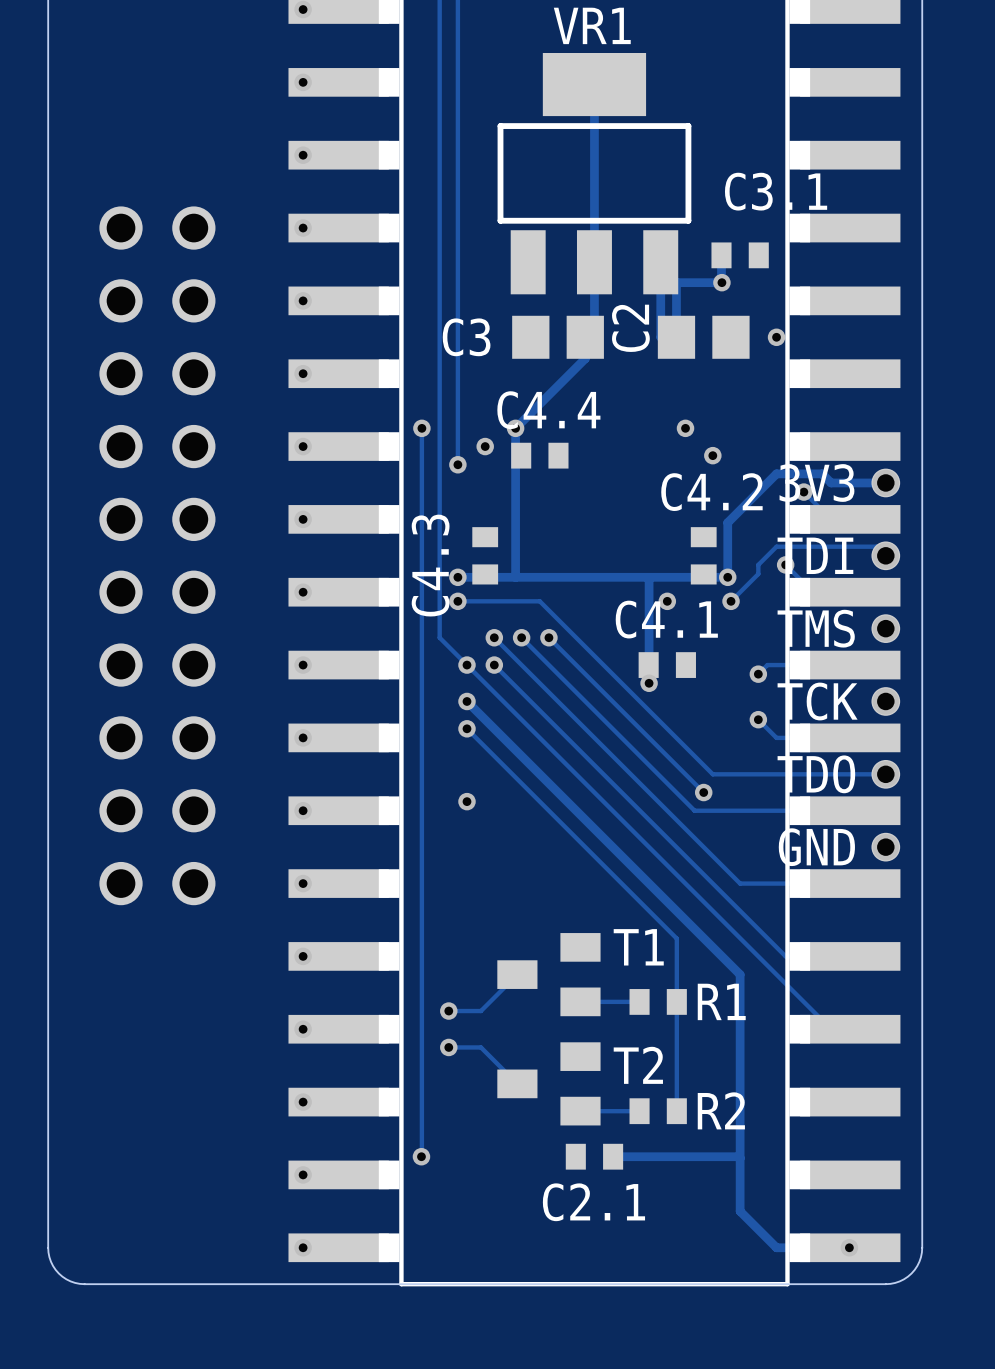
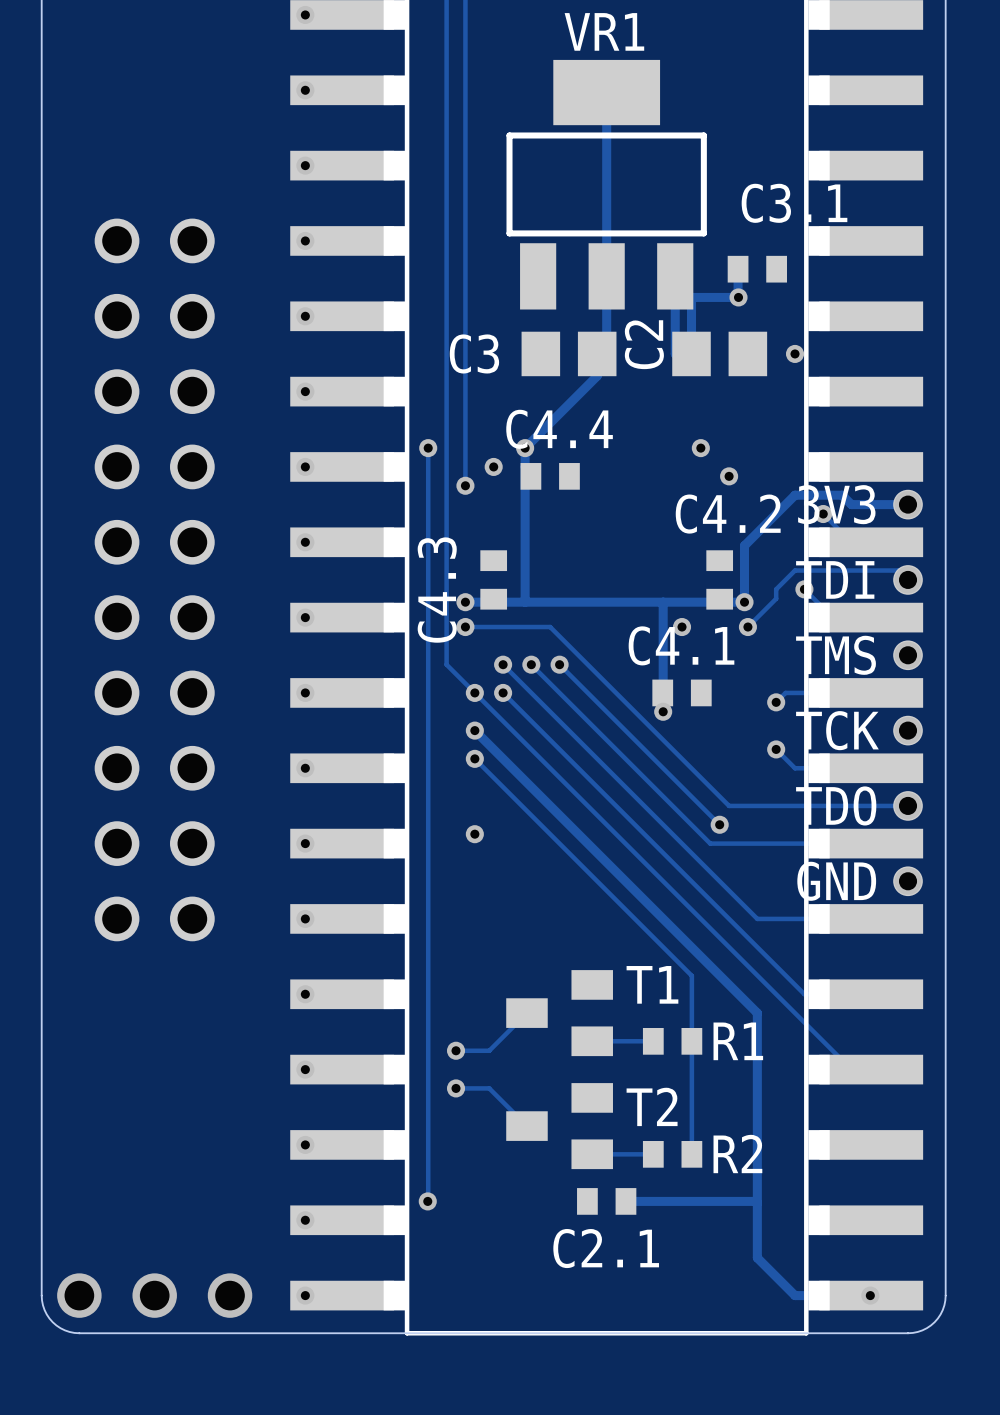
via: none -> (79, 1295)
via: none -> (154, 1295)
via: none -> (230, 1295)

